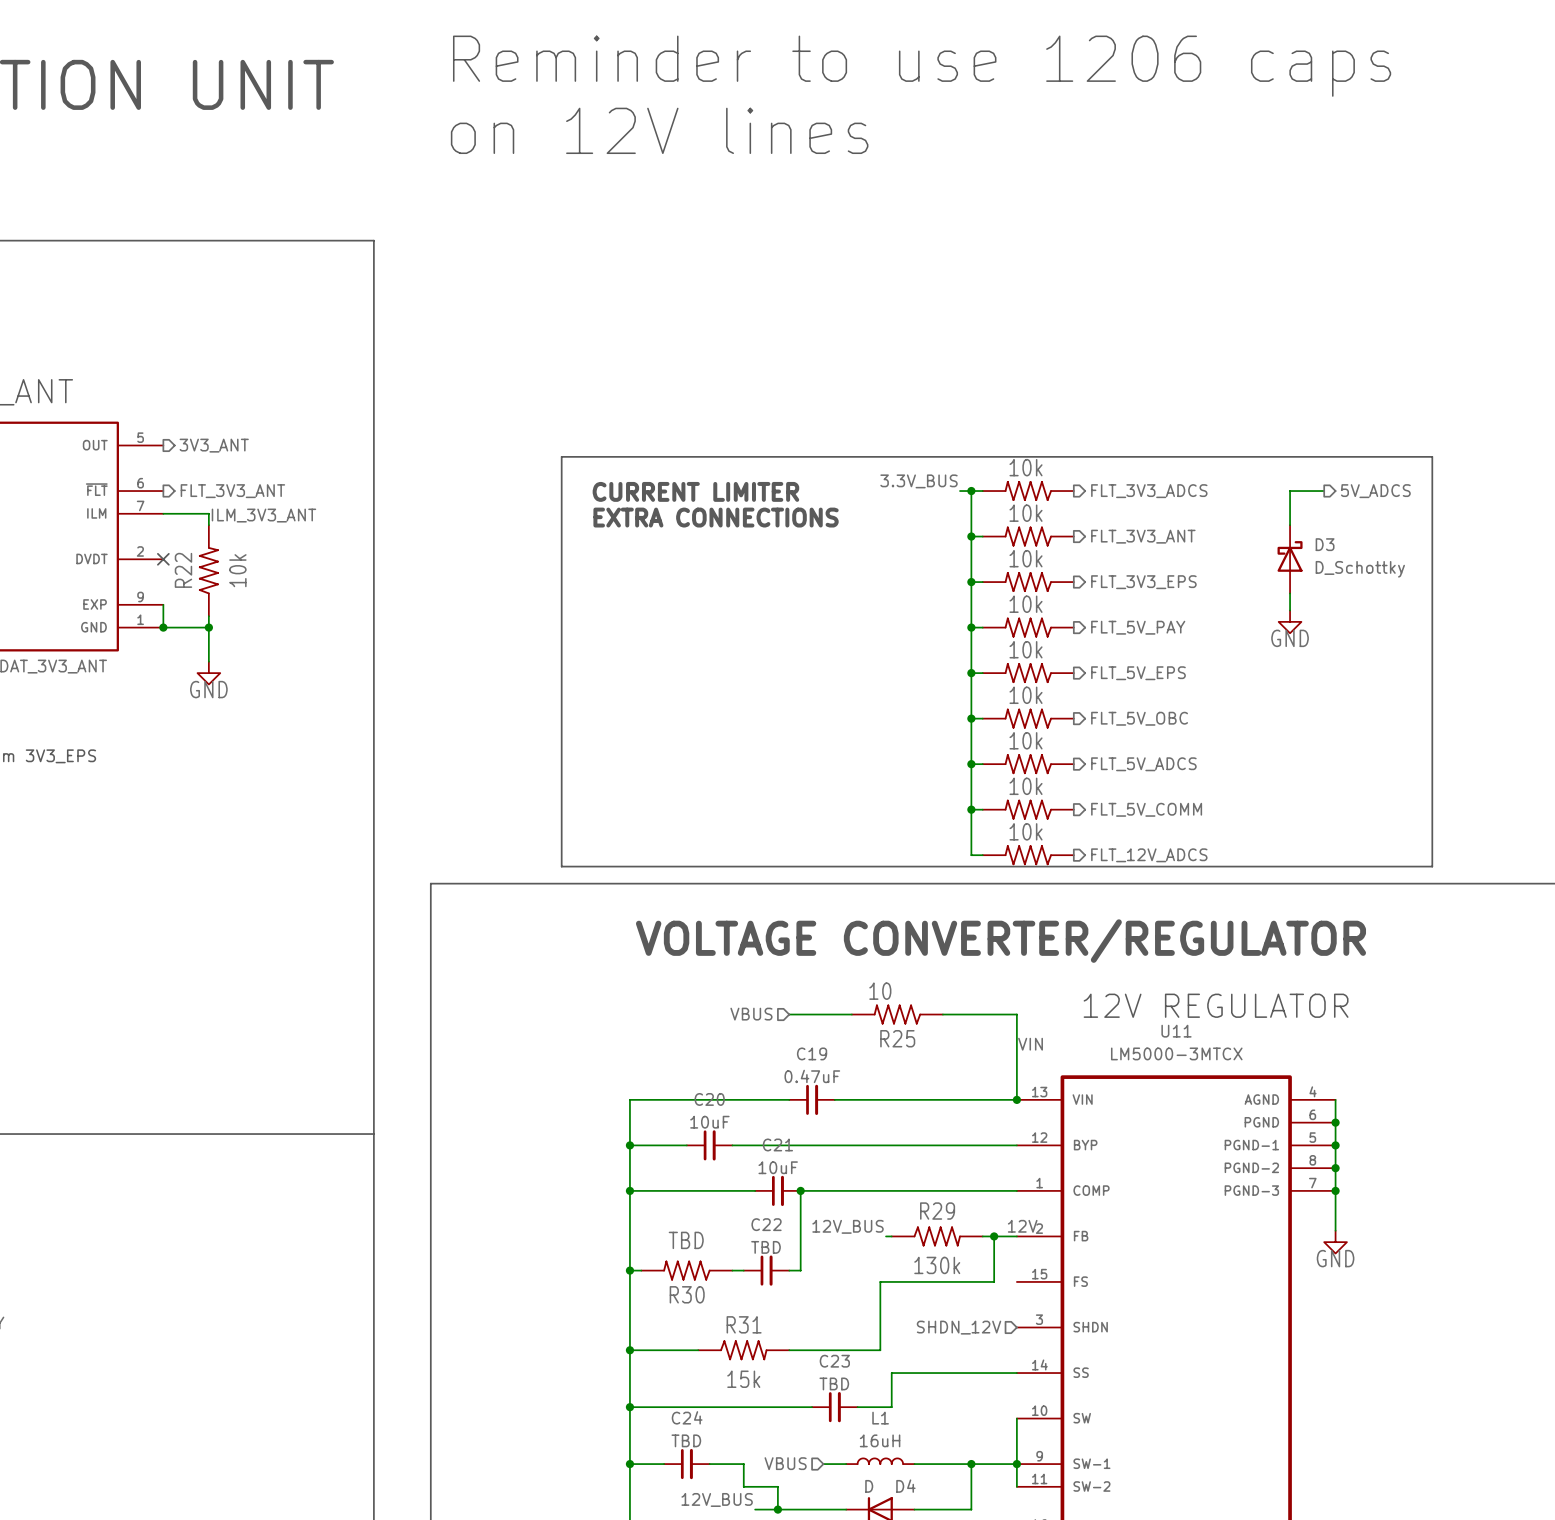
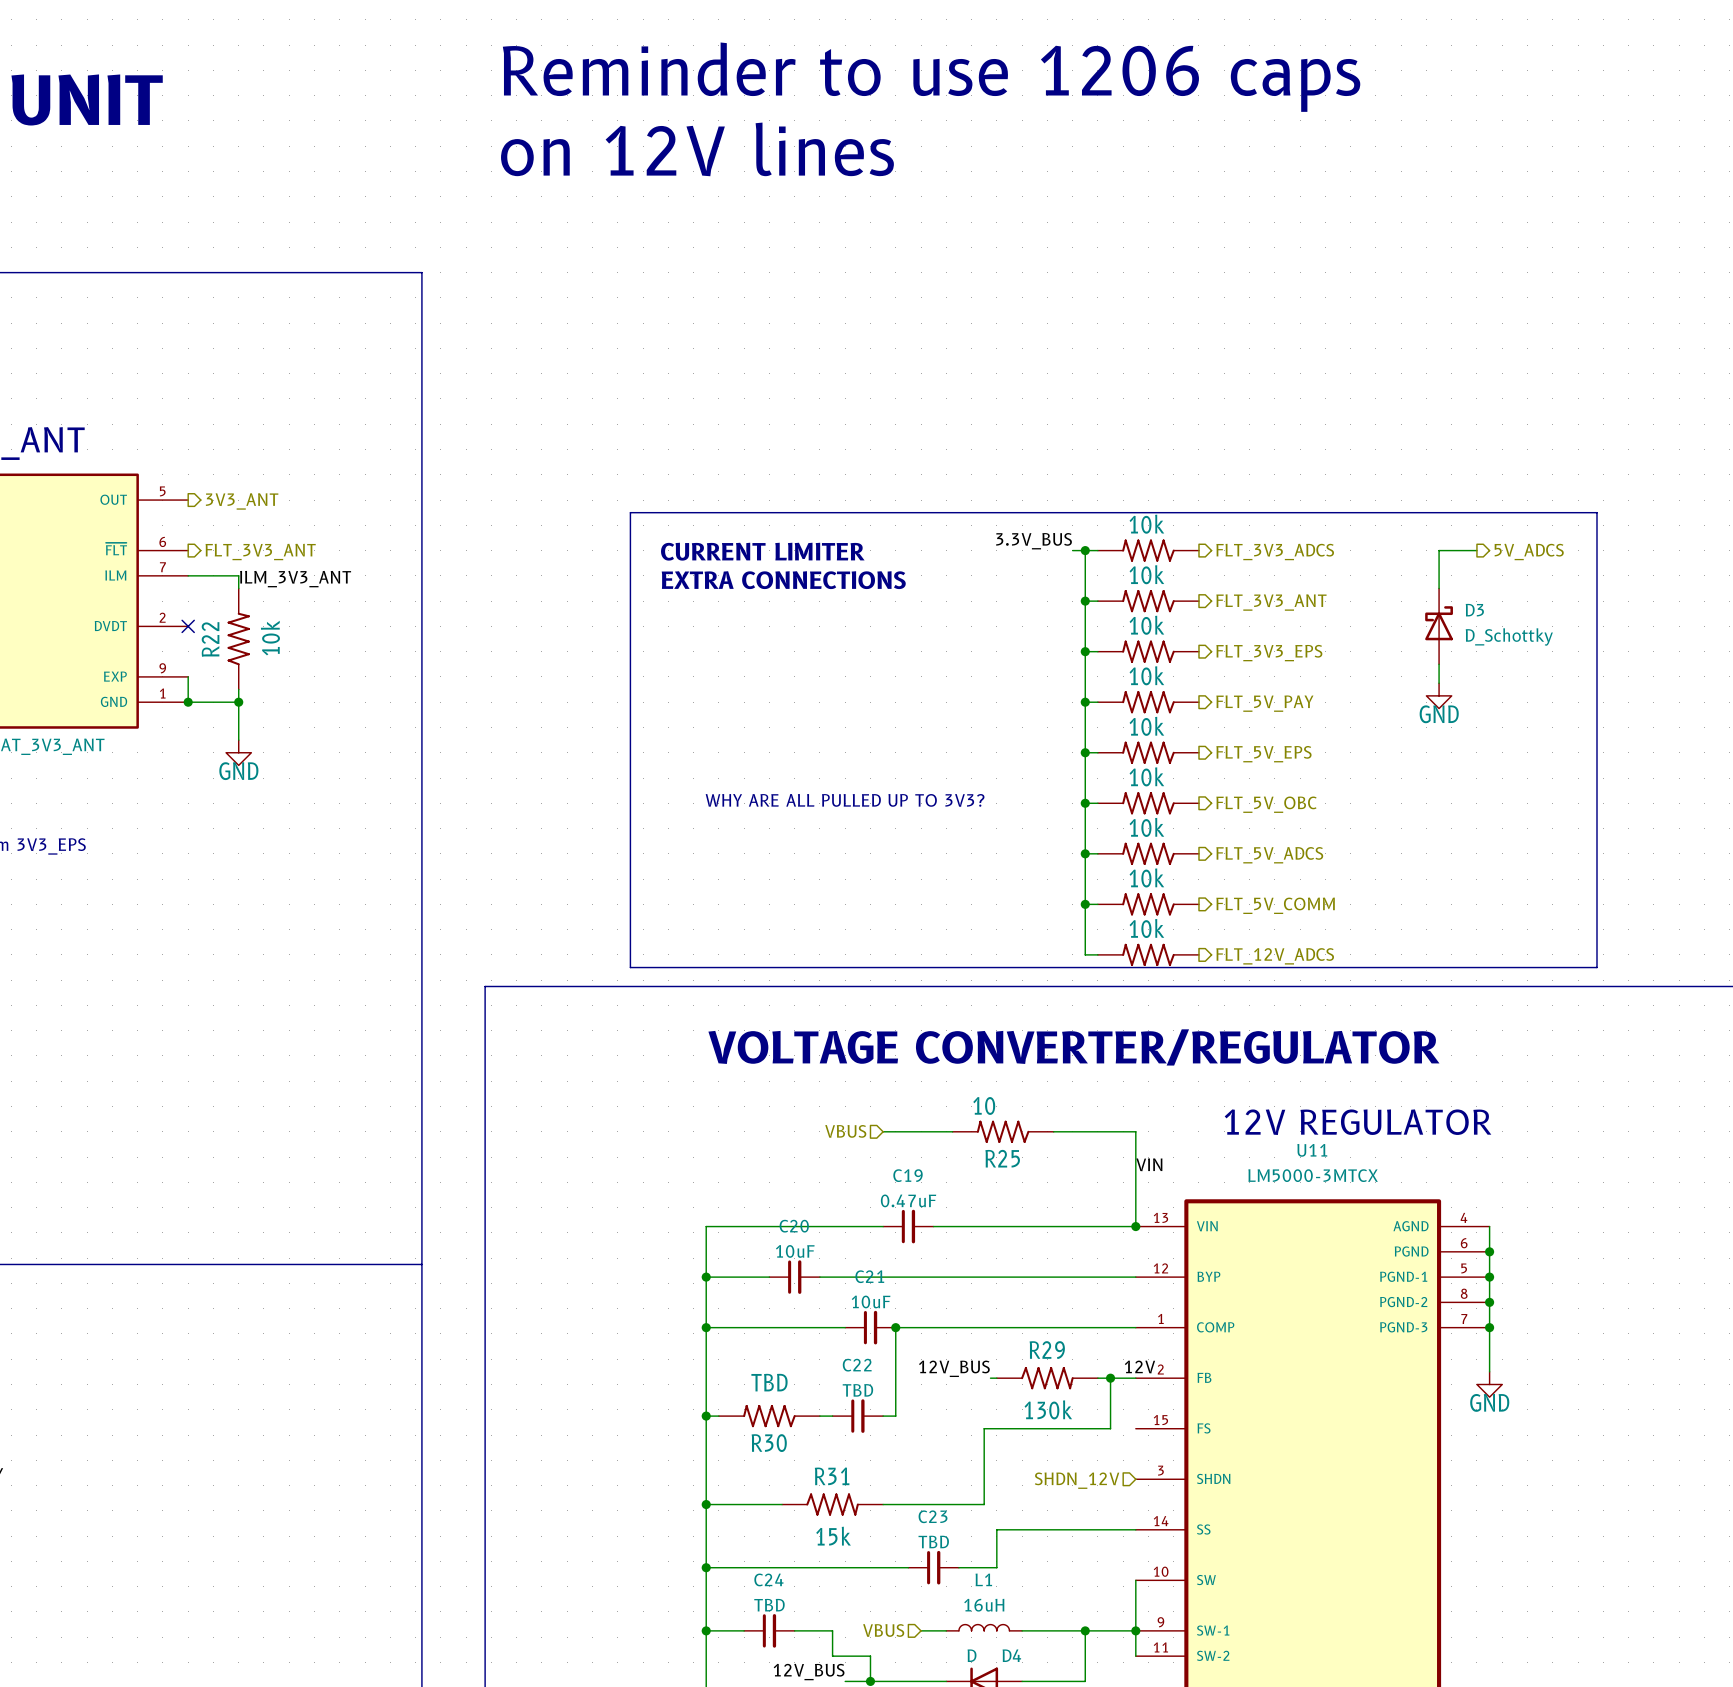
text: none -> WHY ARE ALL PULLED UP TO 3V3? (845, 800)

